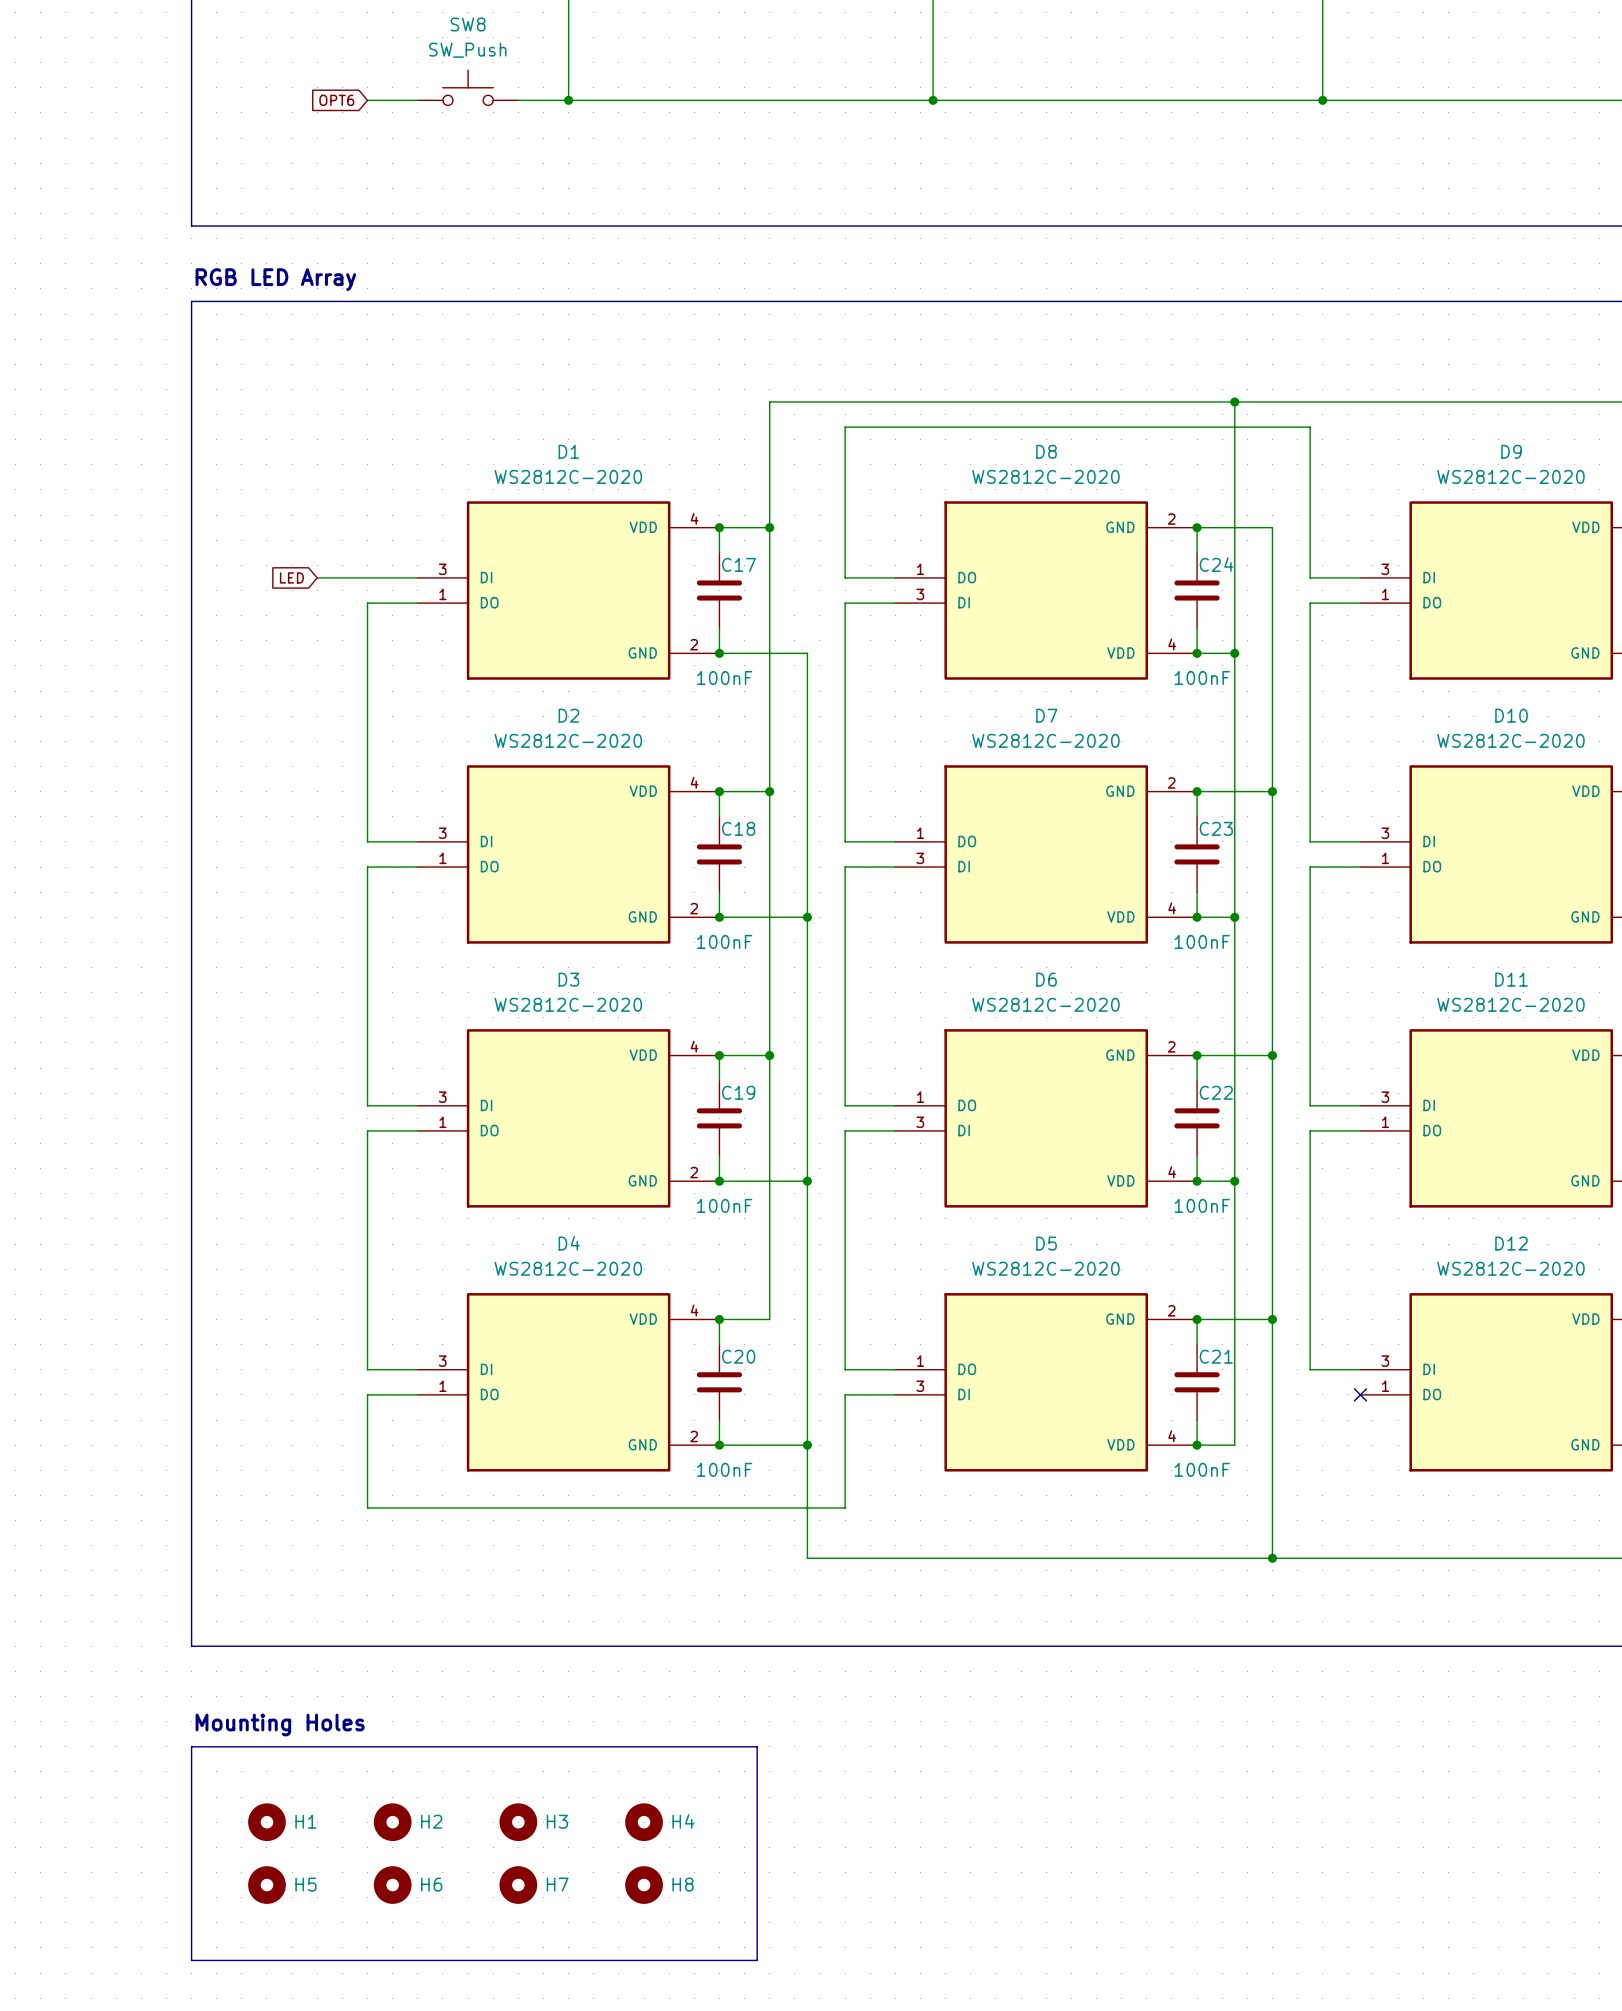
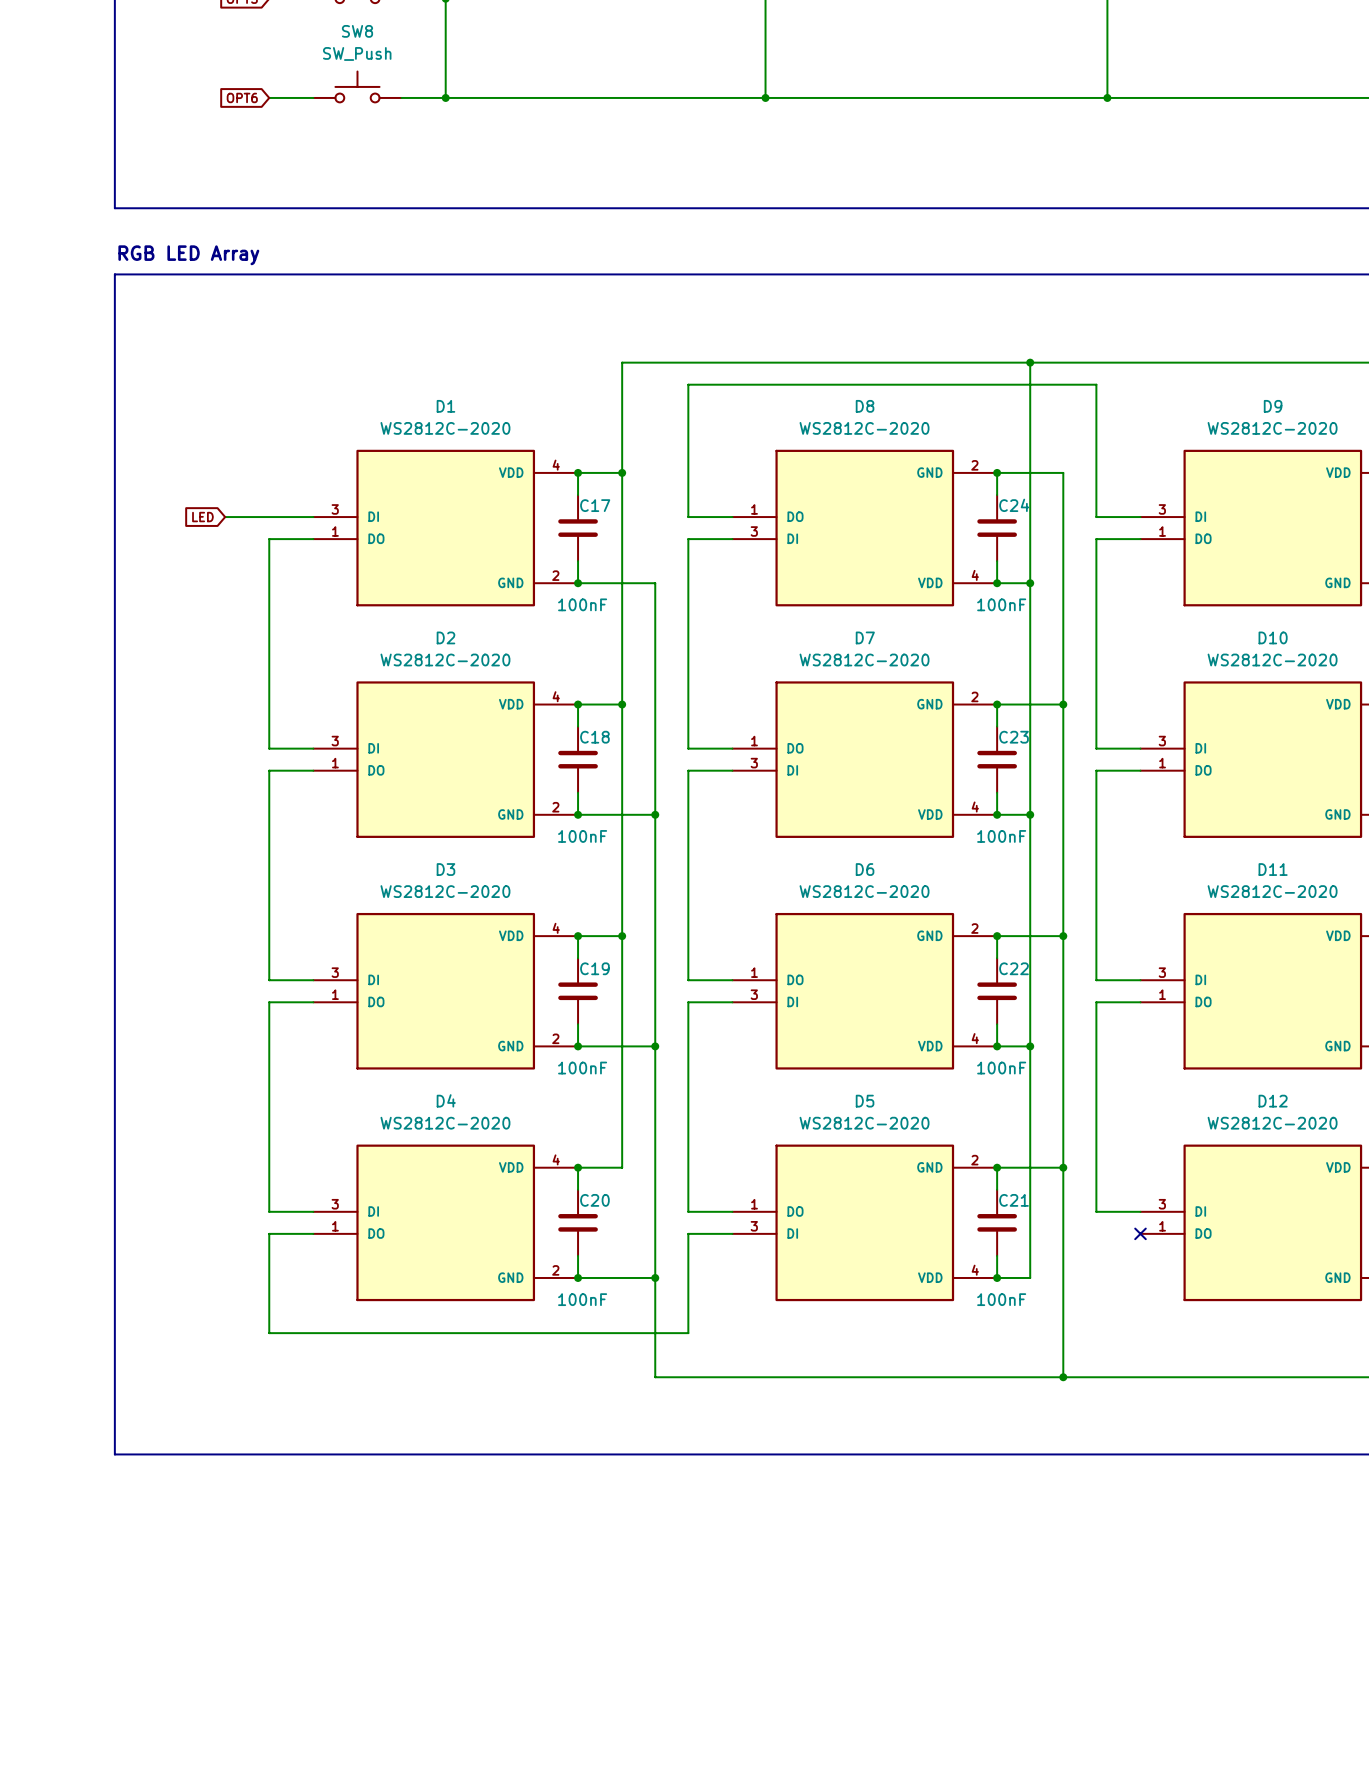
text: Mounting Holes (280, 1724) -> none
line: (191, 1746) (757, 1746) (757, 1960) (191, 1960) (191, 1746) -> none
H1: (266, 1822) -> none
H2: (392, 1822) -> none
H3: (518, 1822) -> none
H4: (644, 1822) -> none
H5: (266, 1885) -> none
H6: (392, 1885) -> none
H7: (518, 1885) -> none
H8: (644, 1885) -> none

